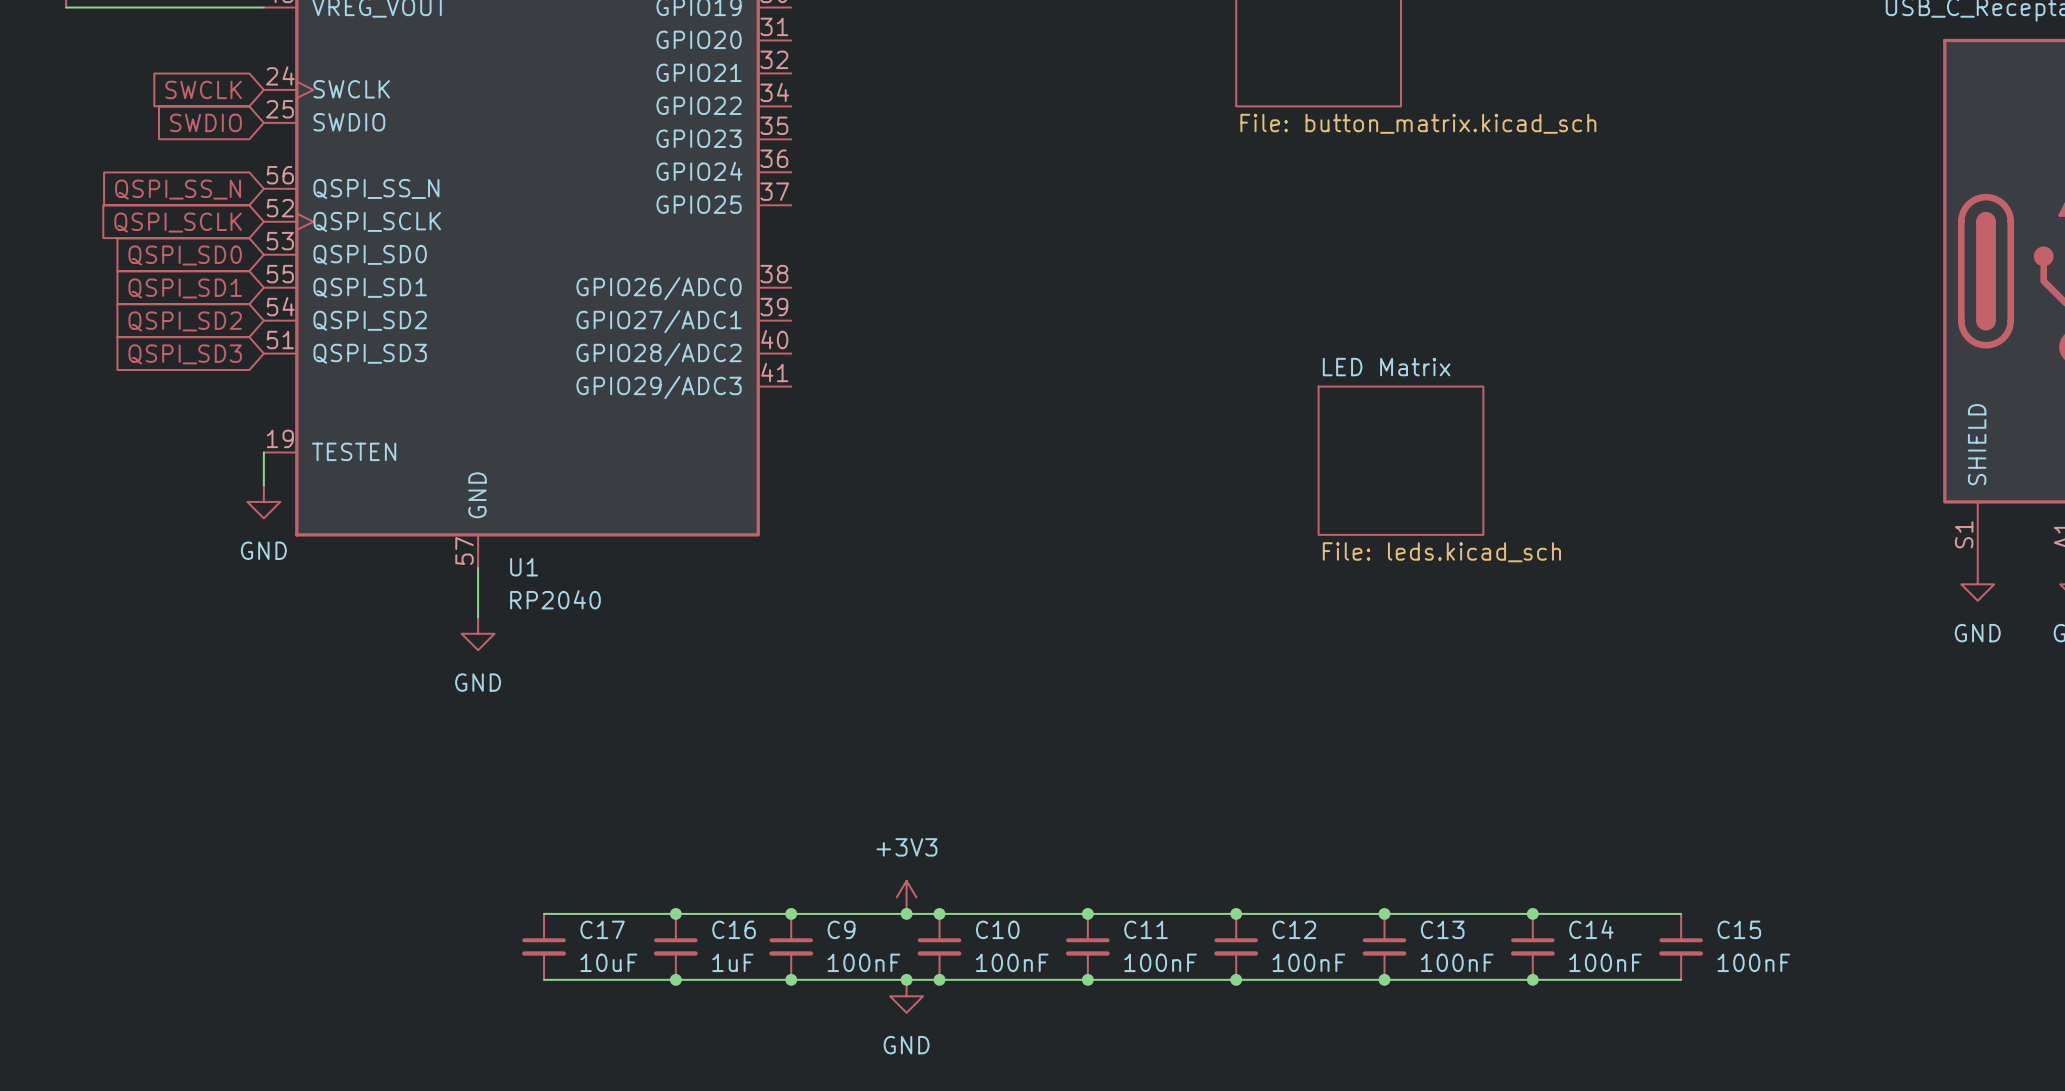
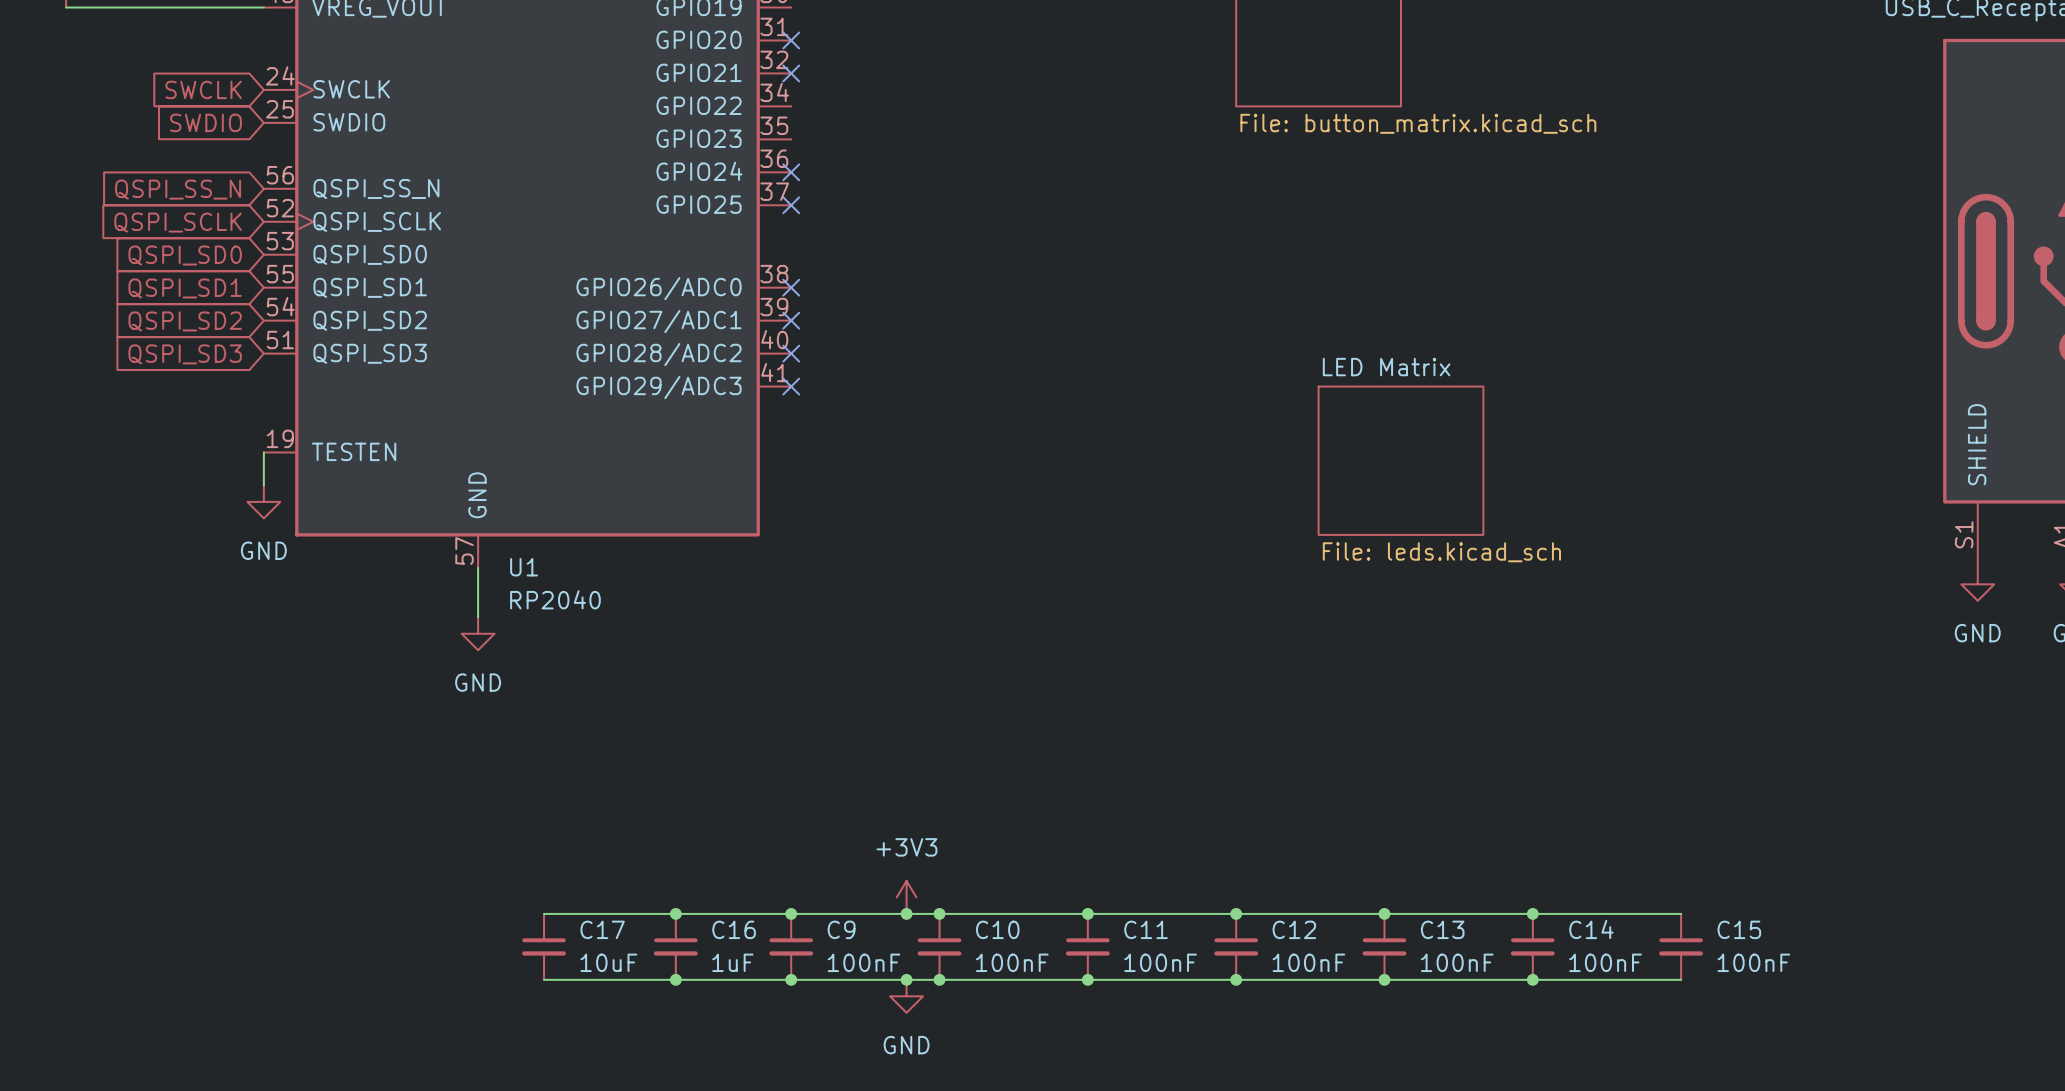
no-connect mark: none -> (791, 40)
no-connect mark: none -> (791, 73)
no-connect mark: none -> (791, 172)
no-connect mark: none -> (791, 205)
no-connect mark: none -> (791, 287)
no-connect mark: none -> (791, 320)
no-connect mark: none -> (791, 353)
no-connect mark: none -> (791, 386)

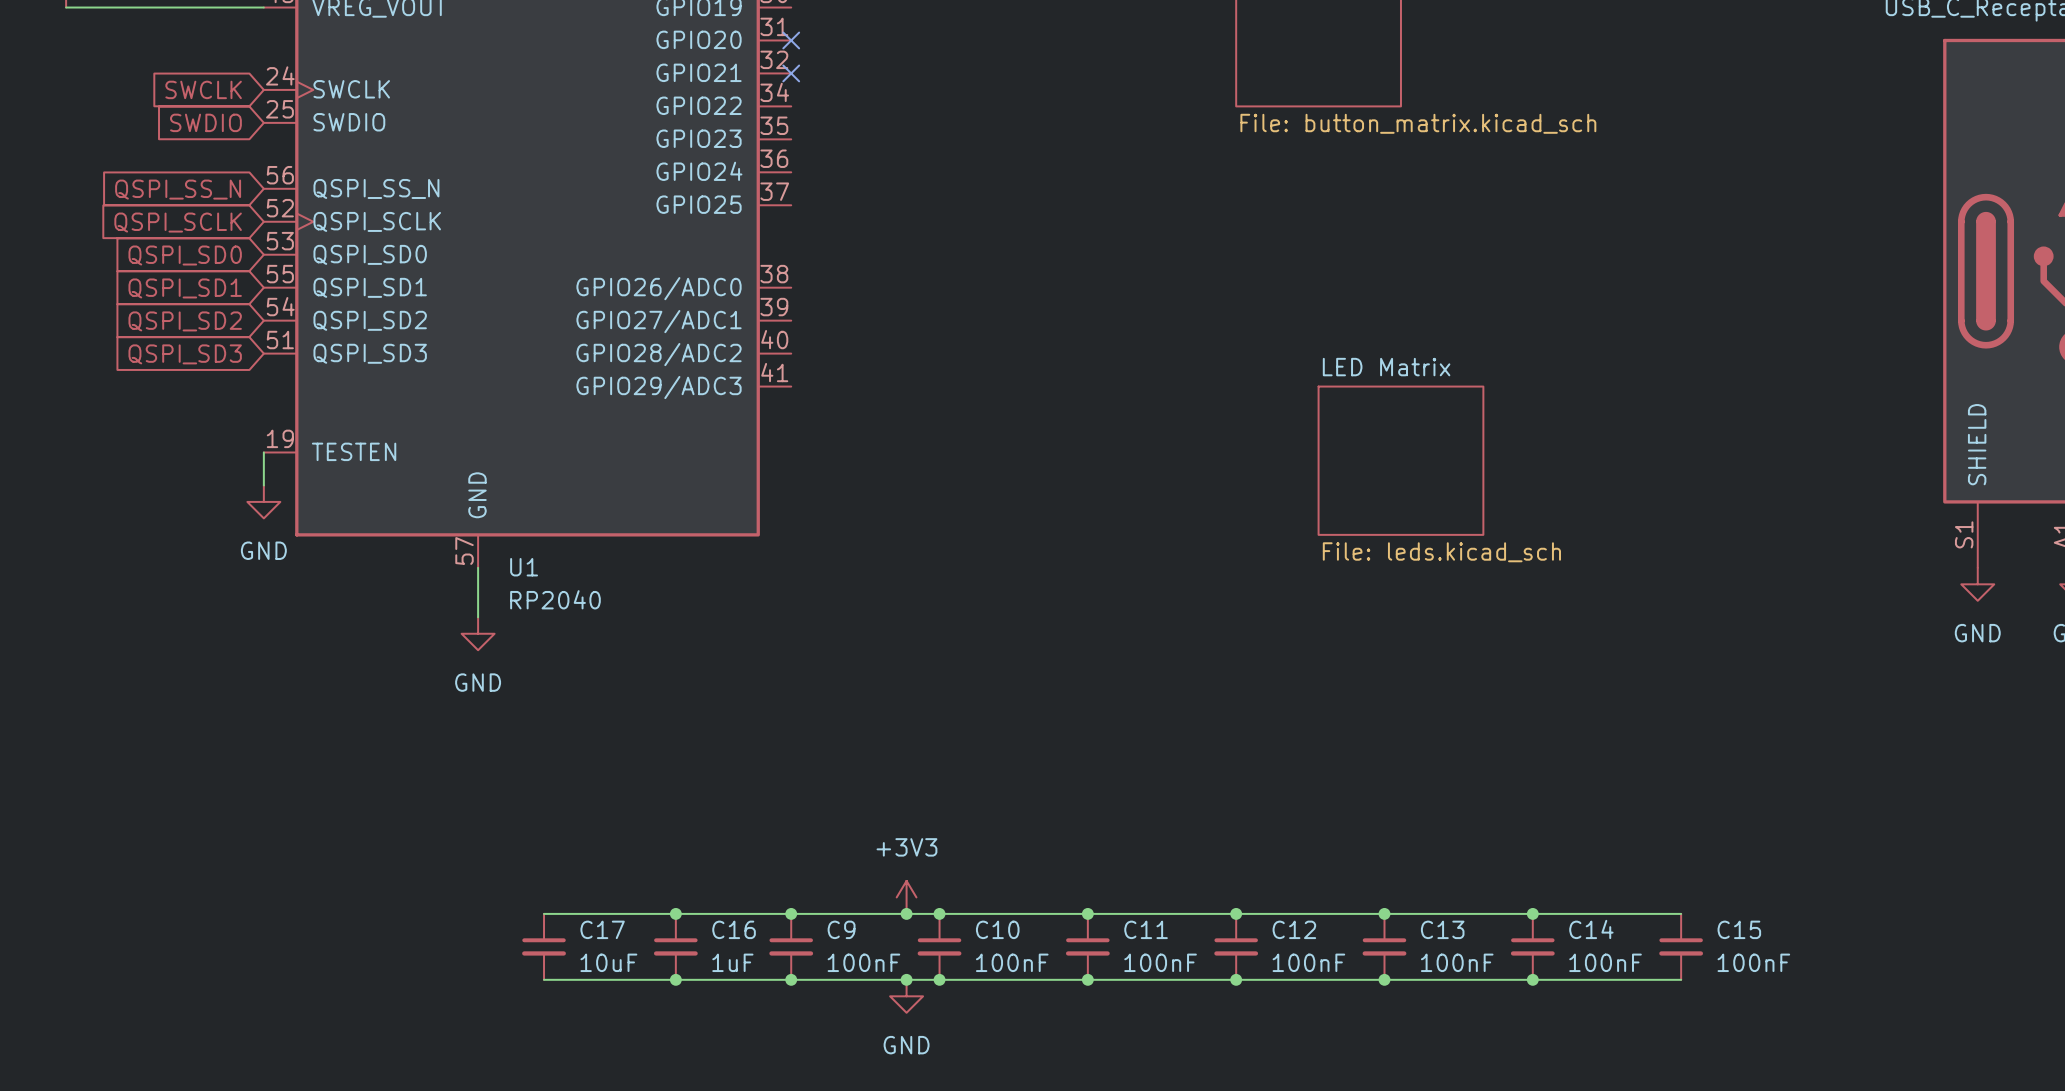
no-connect mark: (791, 172) -> none
no-connect mark: (791, 205) -> none
no-connect mark: (791, 287) -> none
no-connect mark: (791, 320) -> none
no-connect mark: (791, 353) -> none
no-connect mark: (791, 386) -> none

